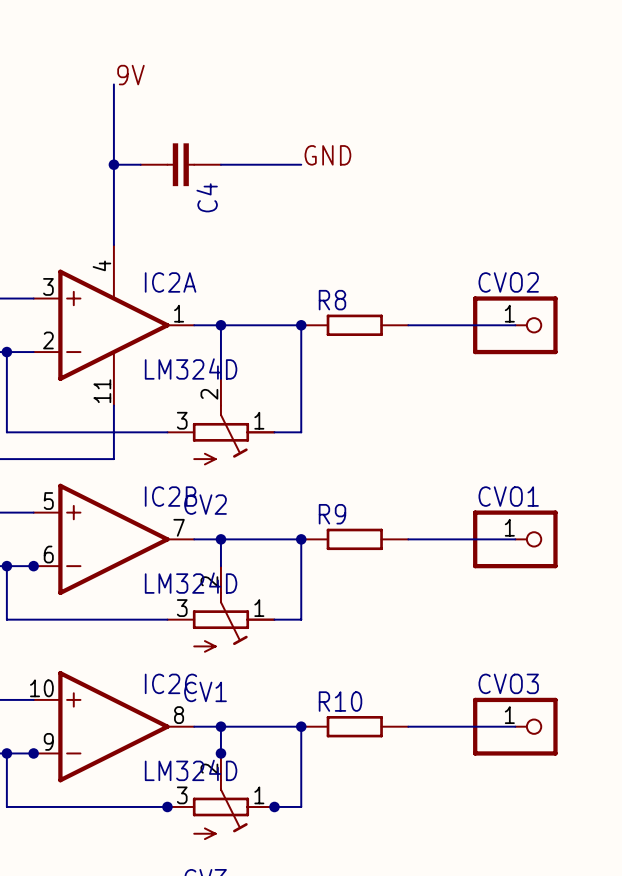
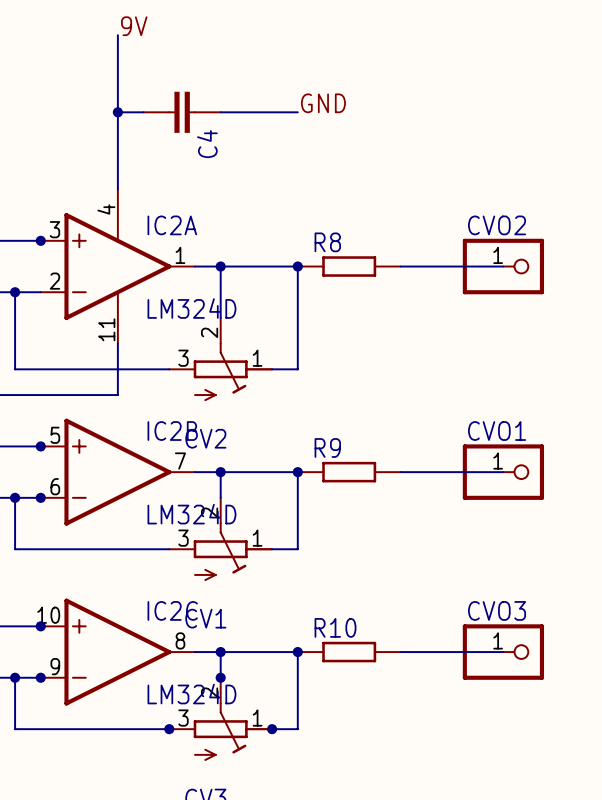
junction: none -> (40, 240)
junction: none -> (40, 446)
junction: none -> (40, 626)

